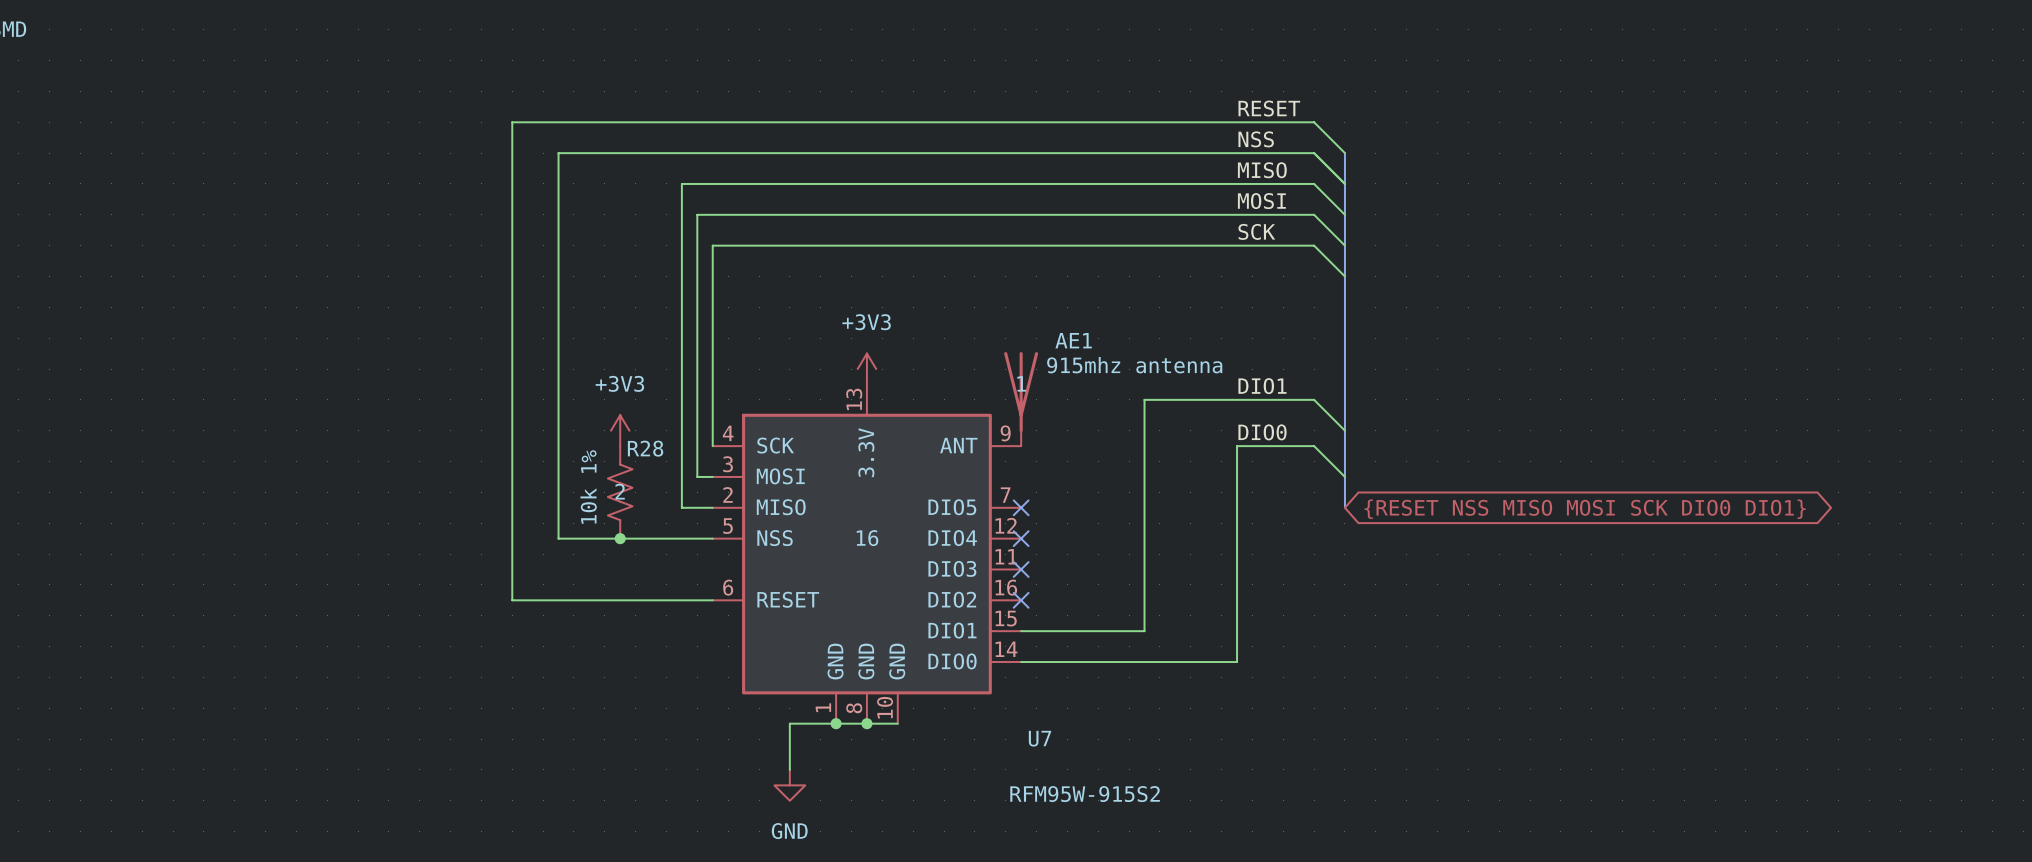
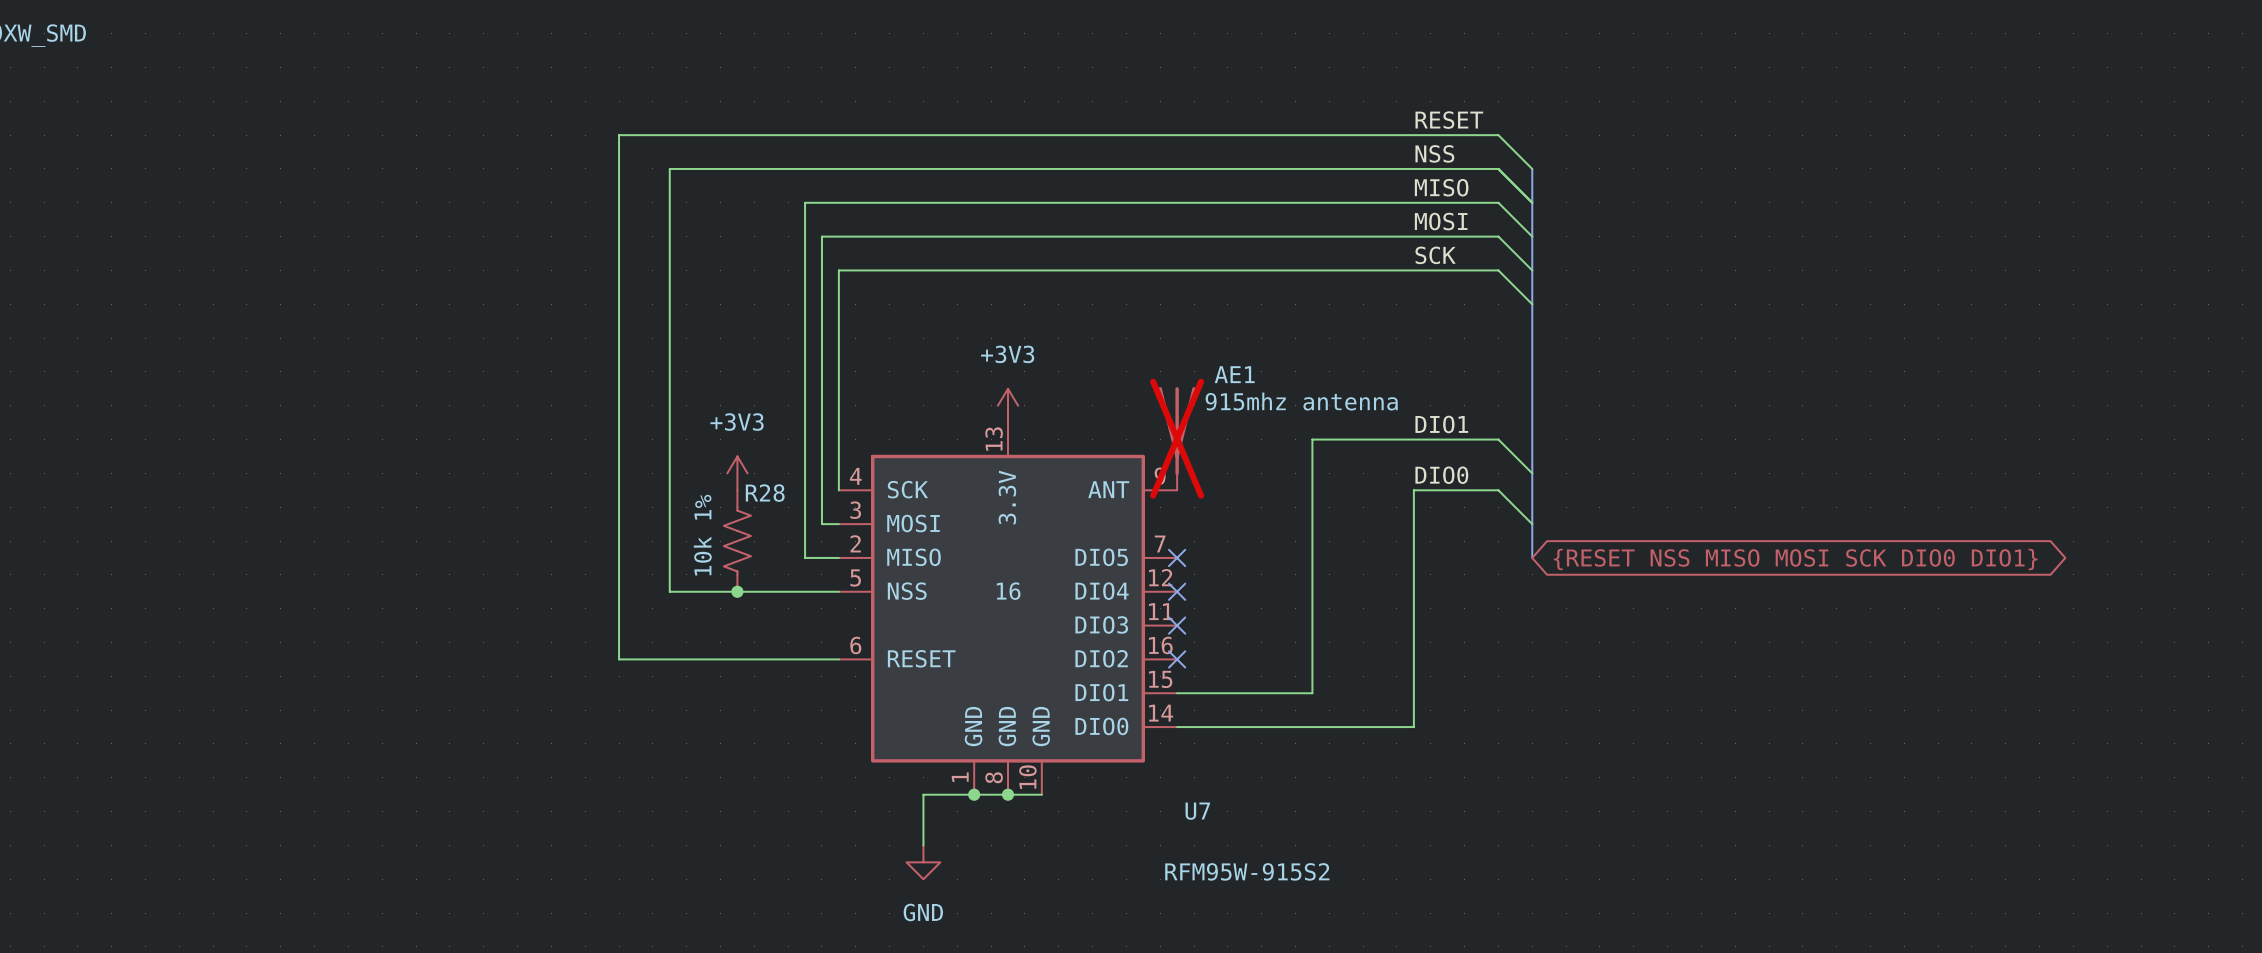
AE1 text: 1 (1021, 383) -> none
AE1 do-not-place cross: none -> (1177, 438)
R28 text: 2 (620, 491) -> none

